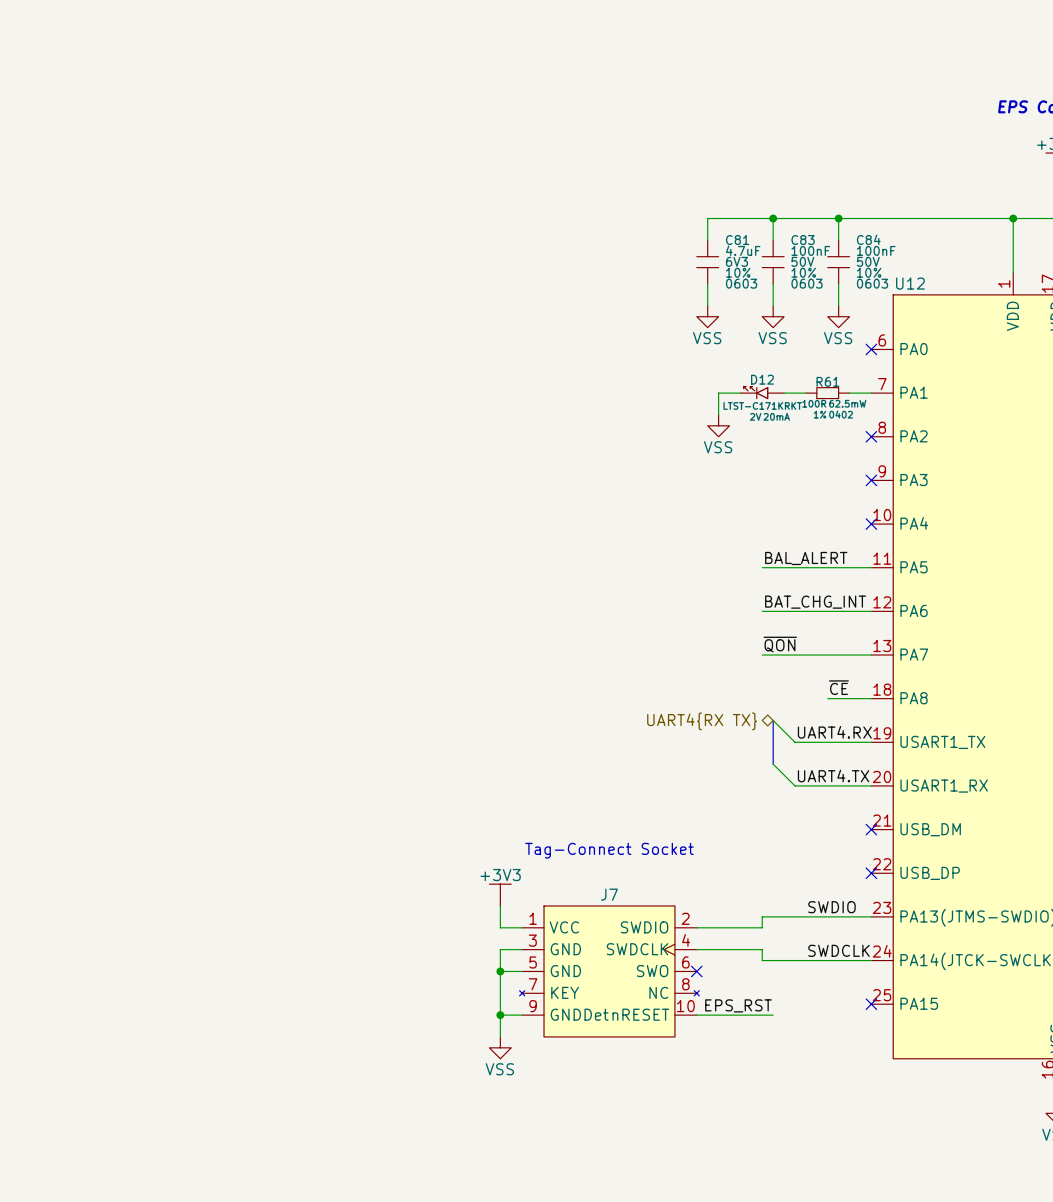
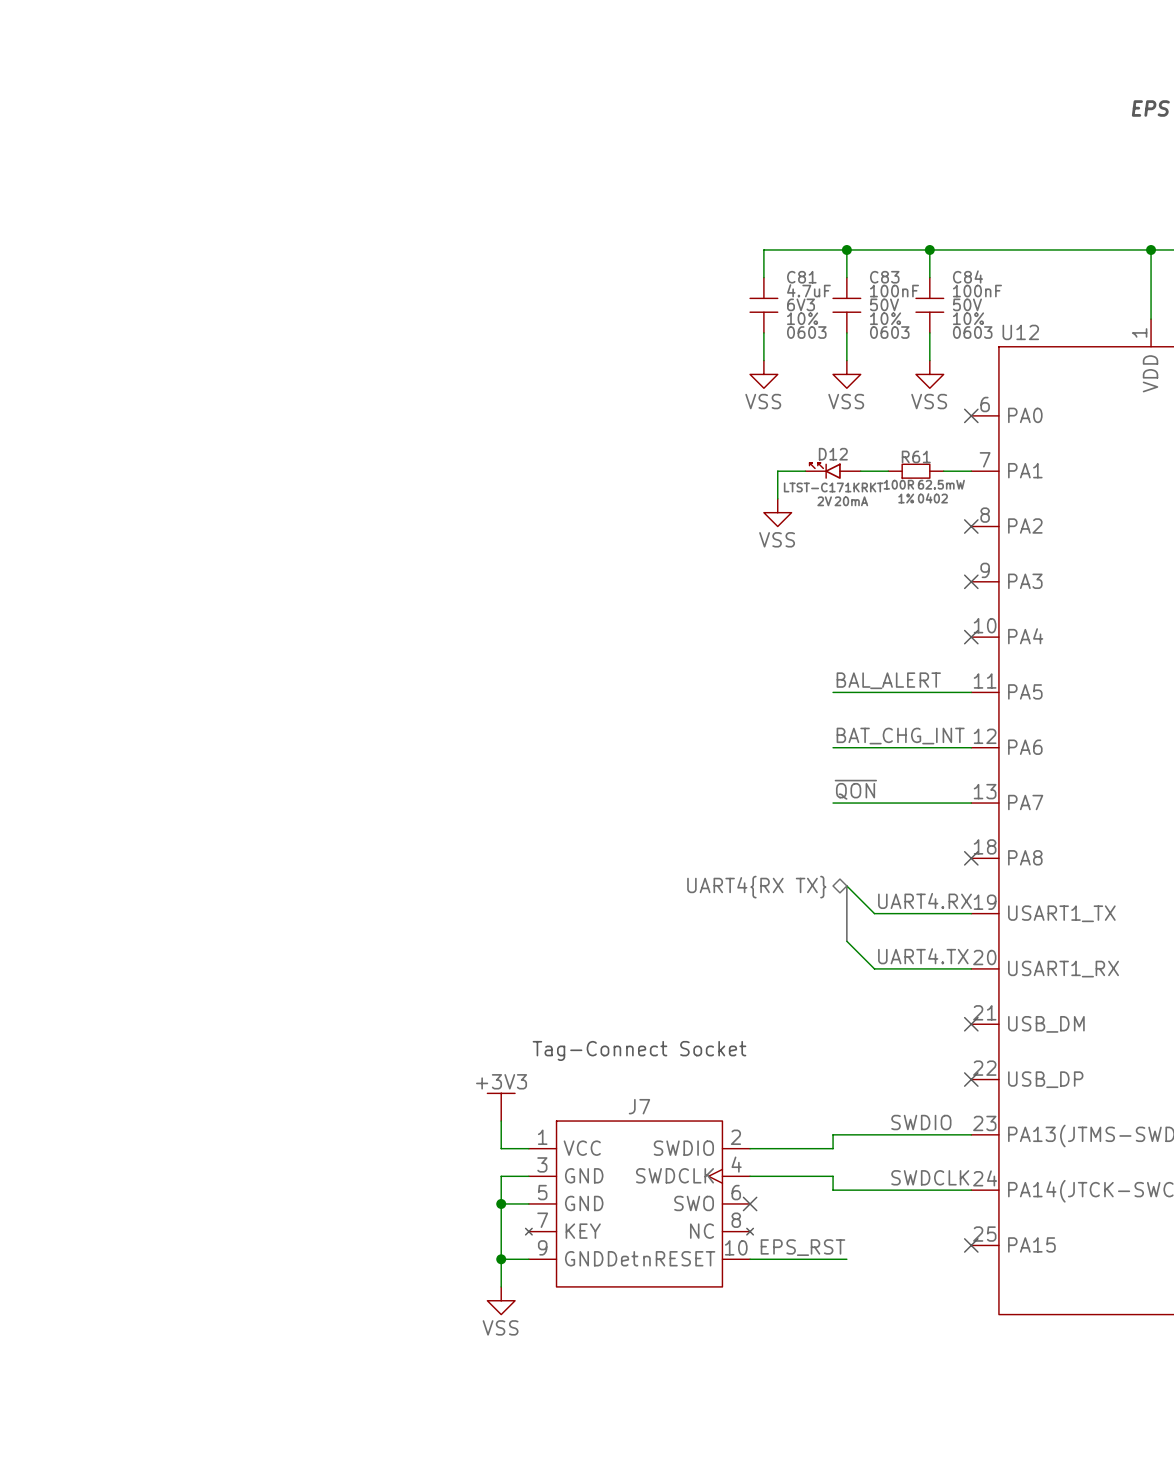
label: ~{CE} (838, 687) -> none
wire: (827, 698) (871, 698) -> none
no-connect mark: none -> (971, 858)

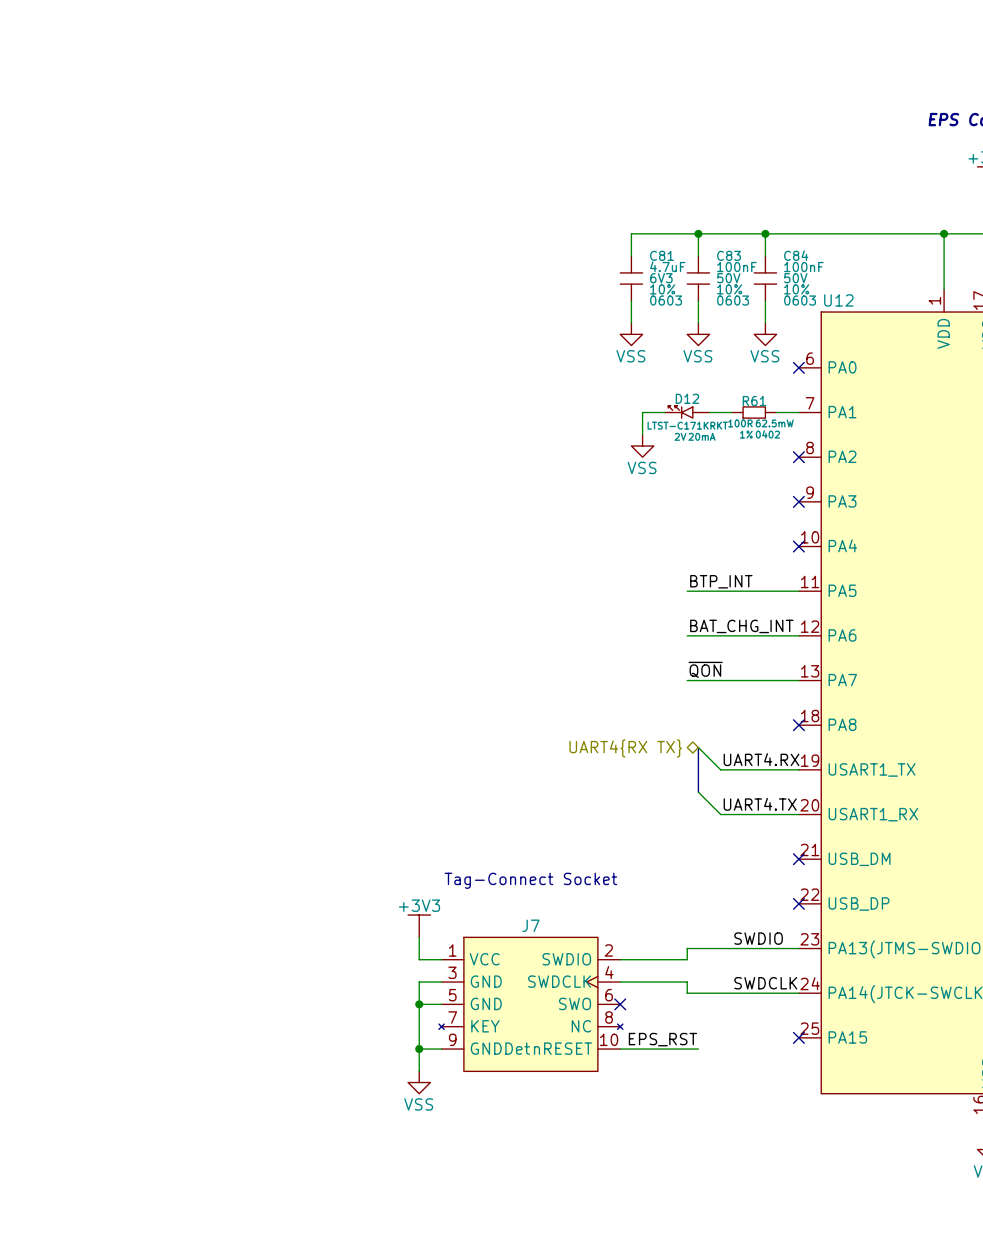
label: BAL_ALERT (888, 680) -> BTP_INT (721, 581)

